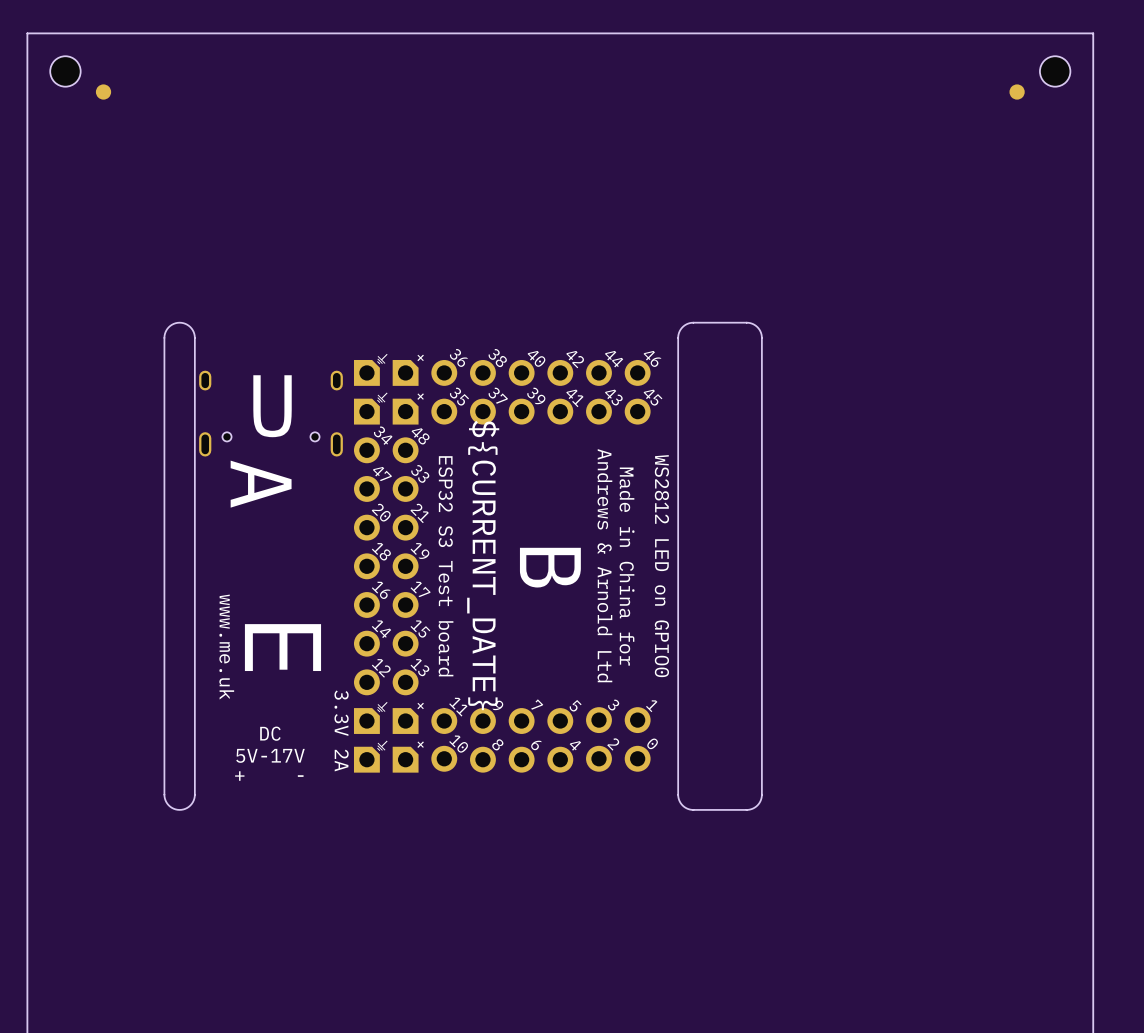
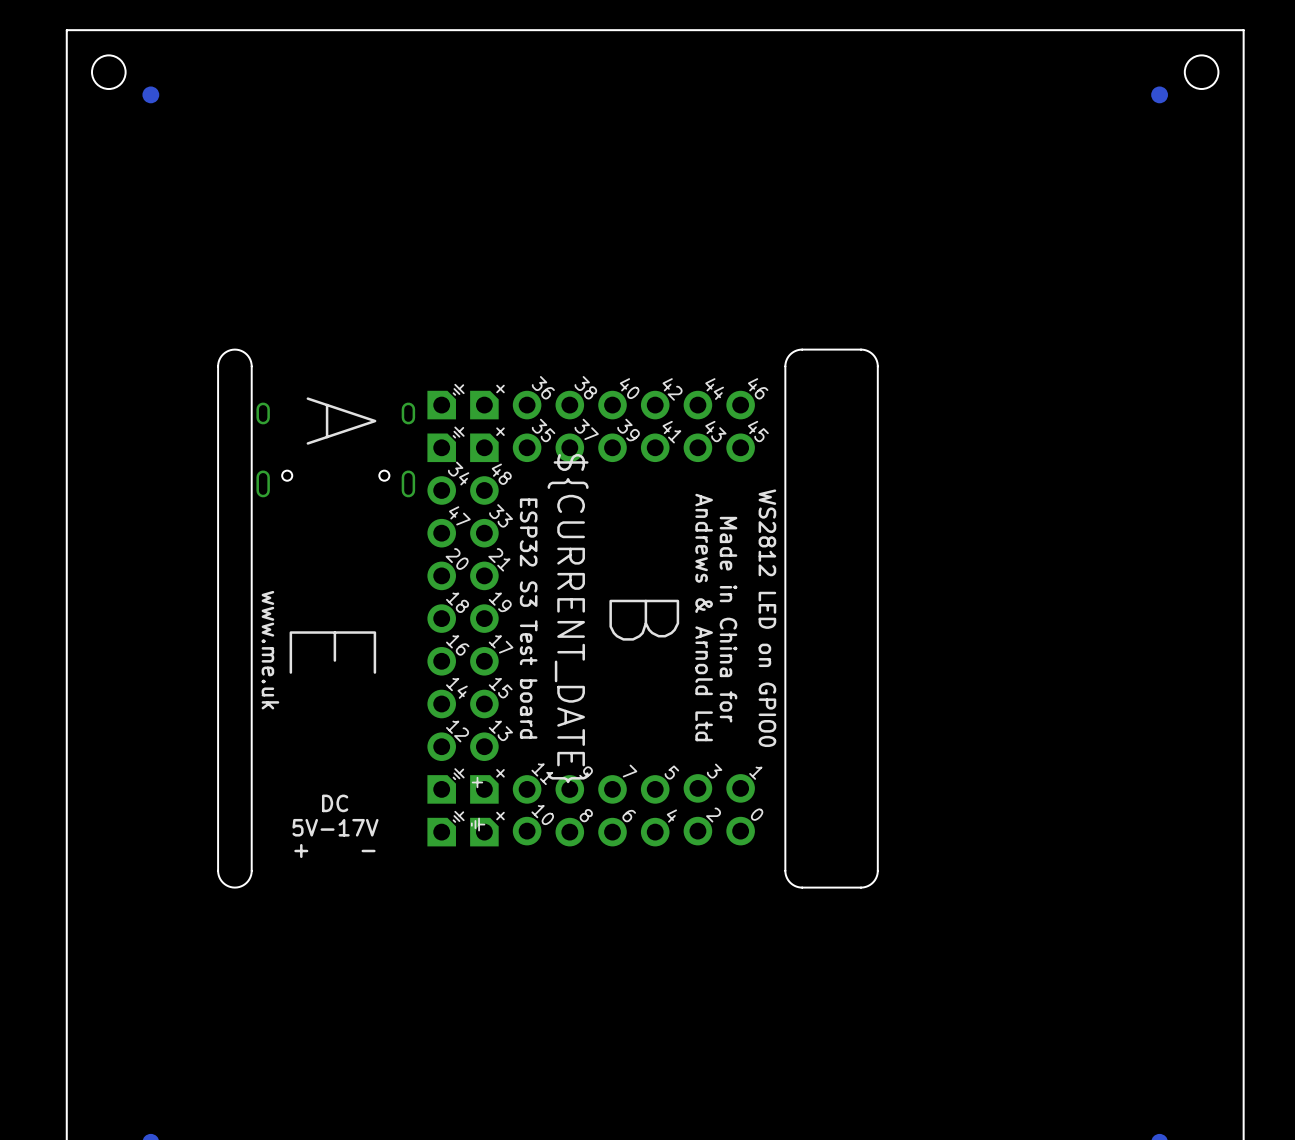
text: U (272, 406) -> none
text position: A (261, 484) -> A (341, 421)
text position: www.me.uk (226, 647) -> www.me.uk (270, 650)
text position: E (282, 647) -> E (332, 652)
text: none -> + (477, 782)
text: 3.3V 2A (341, 730) -> none
text: none -> ⏚ (478, 824)

